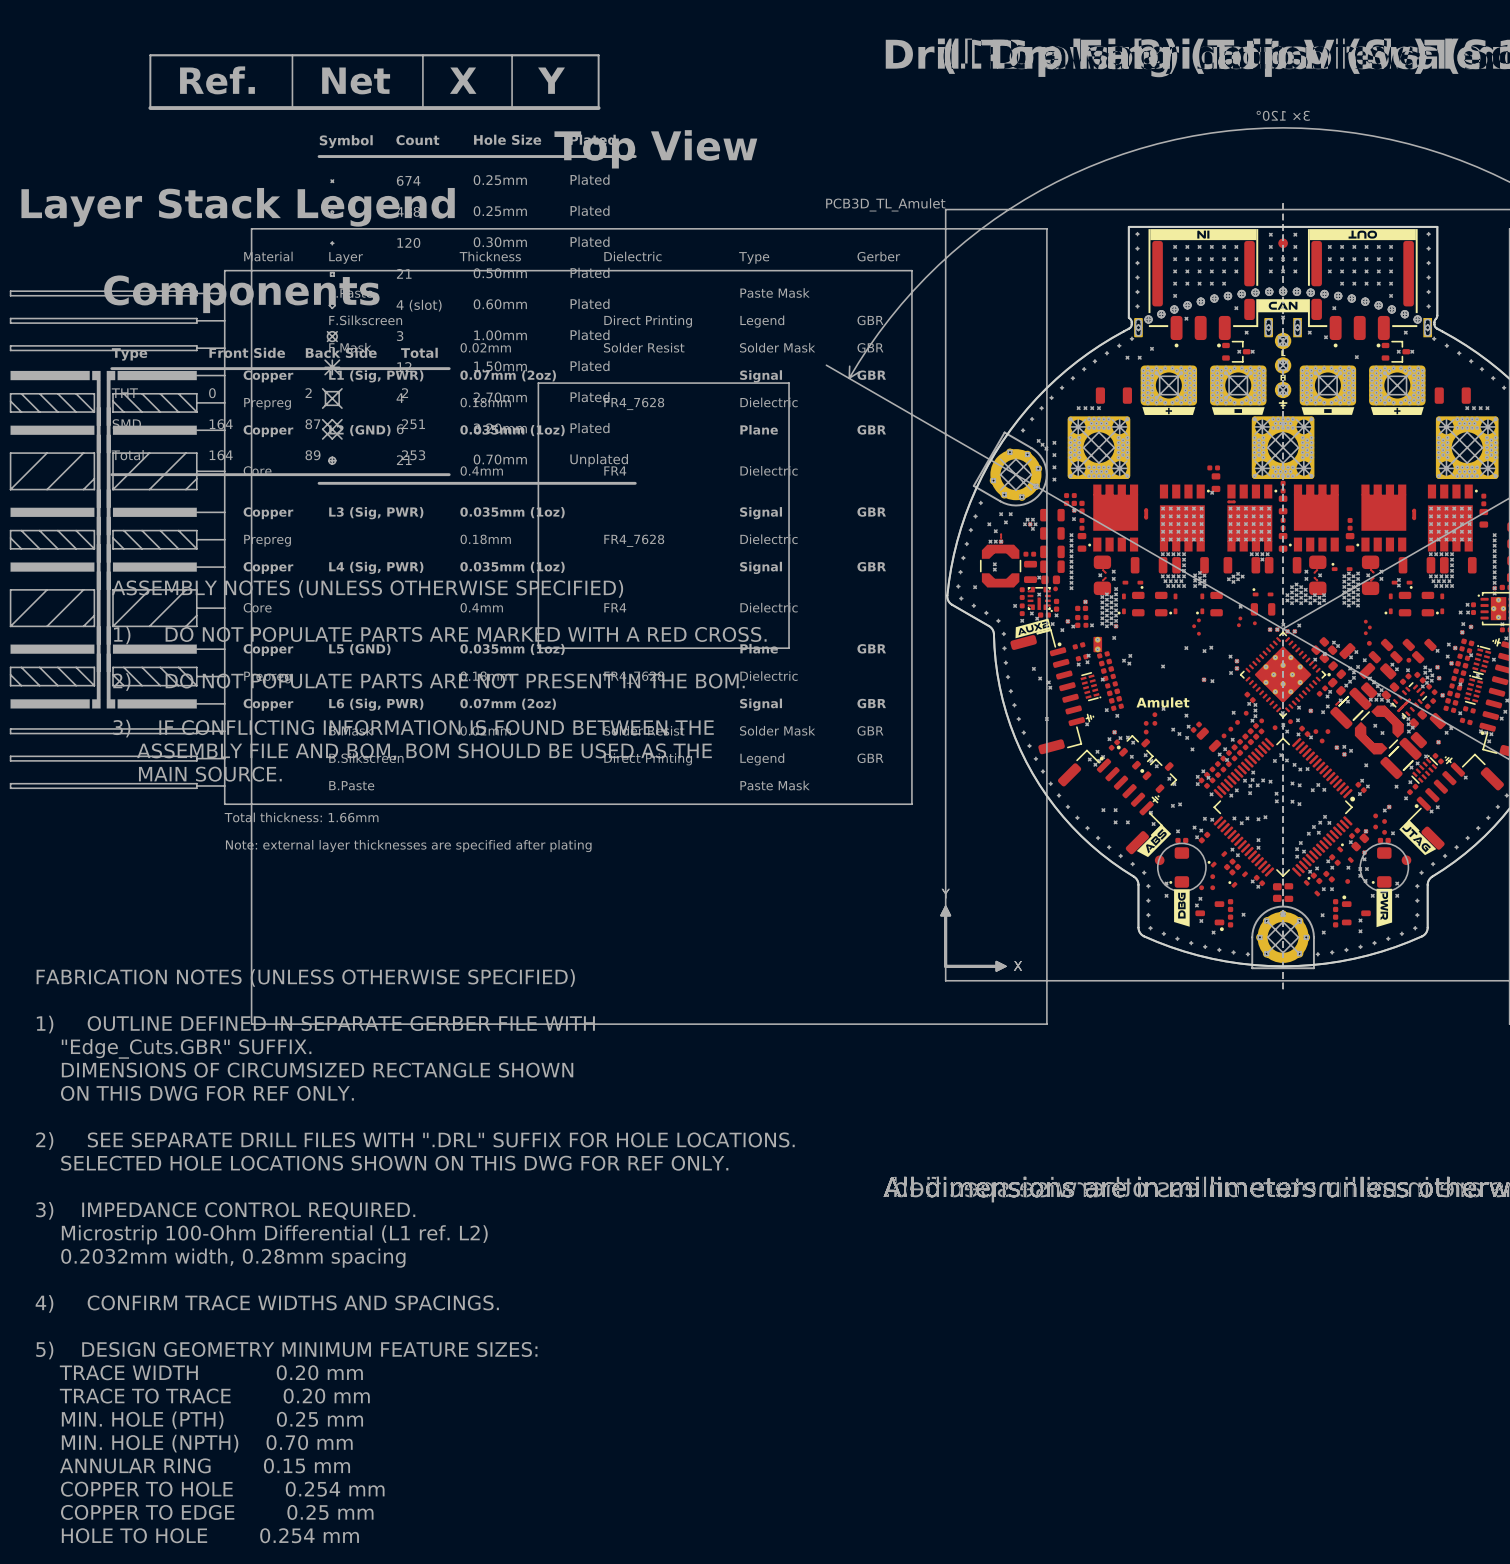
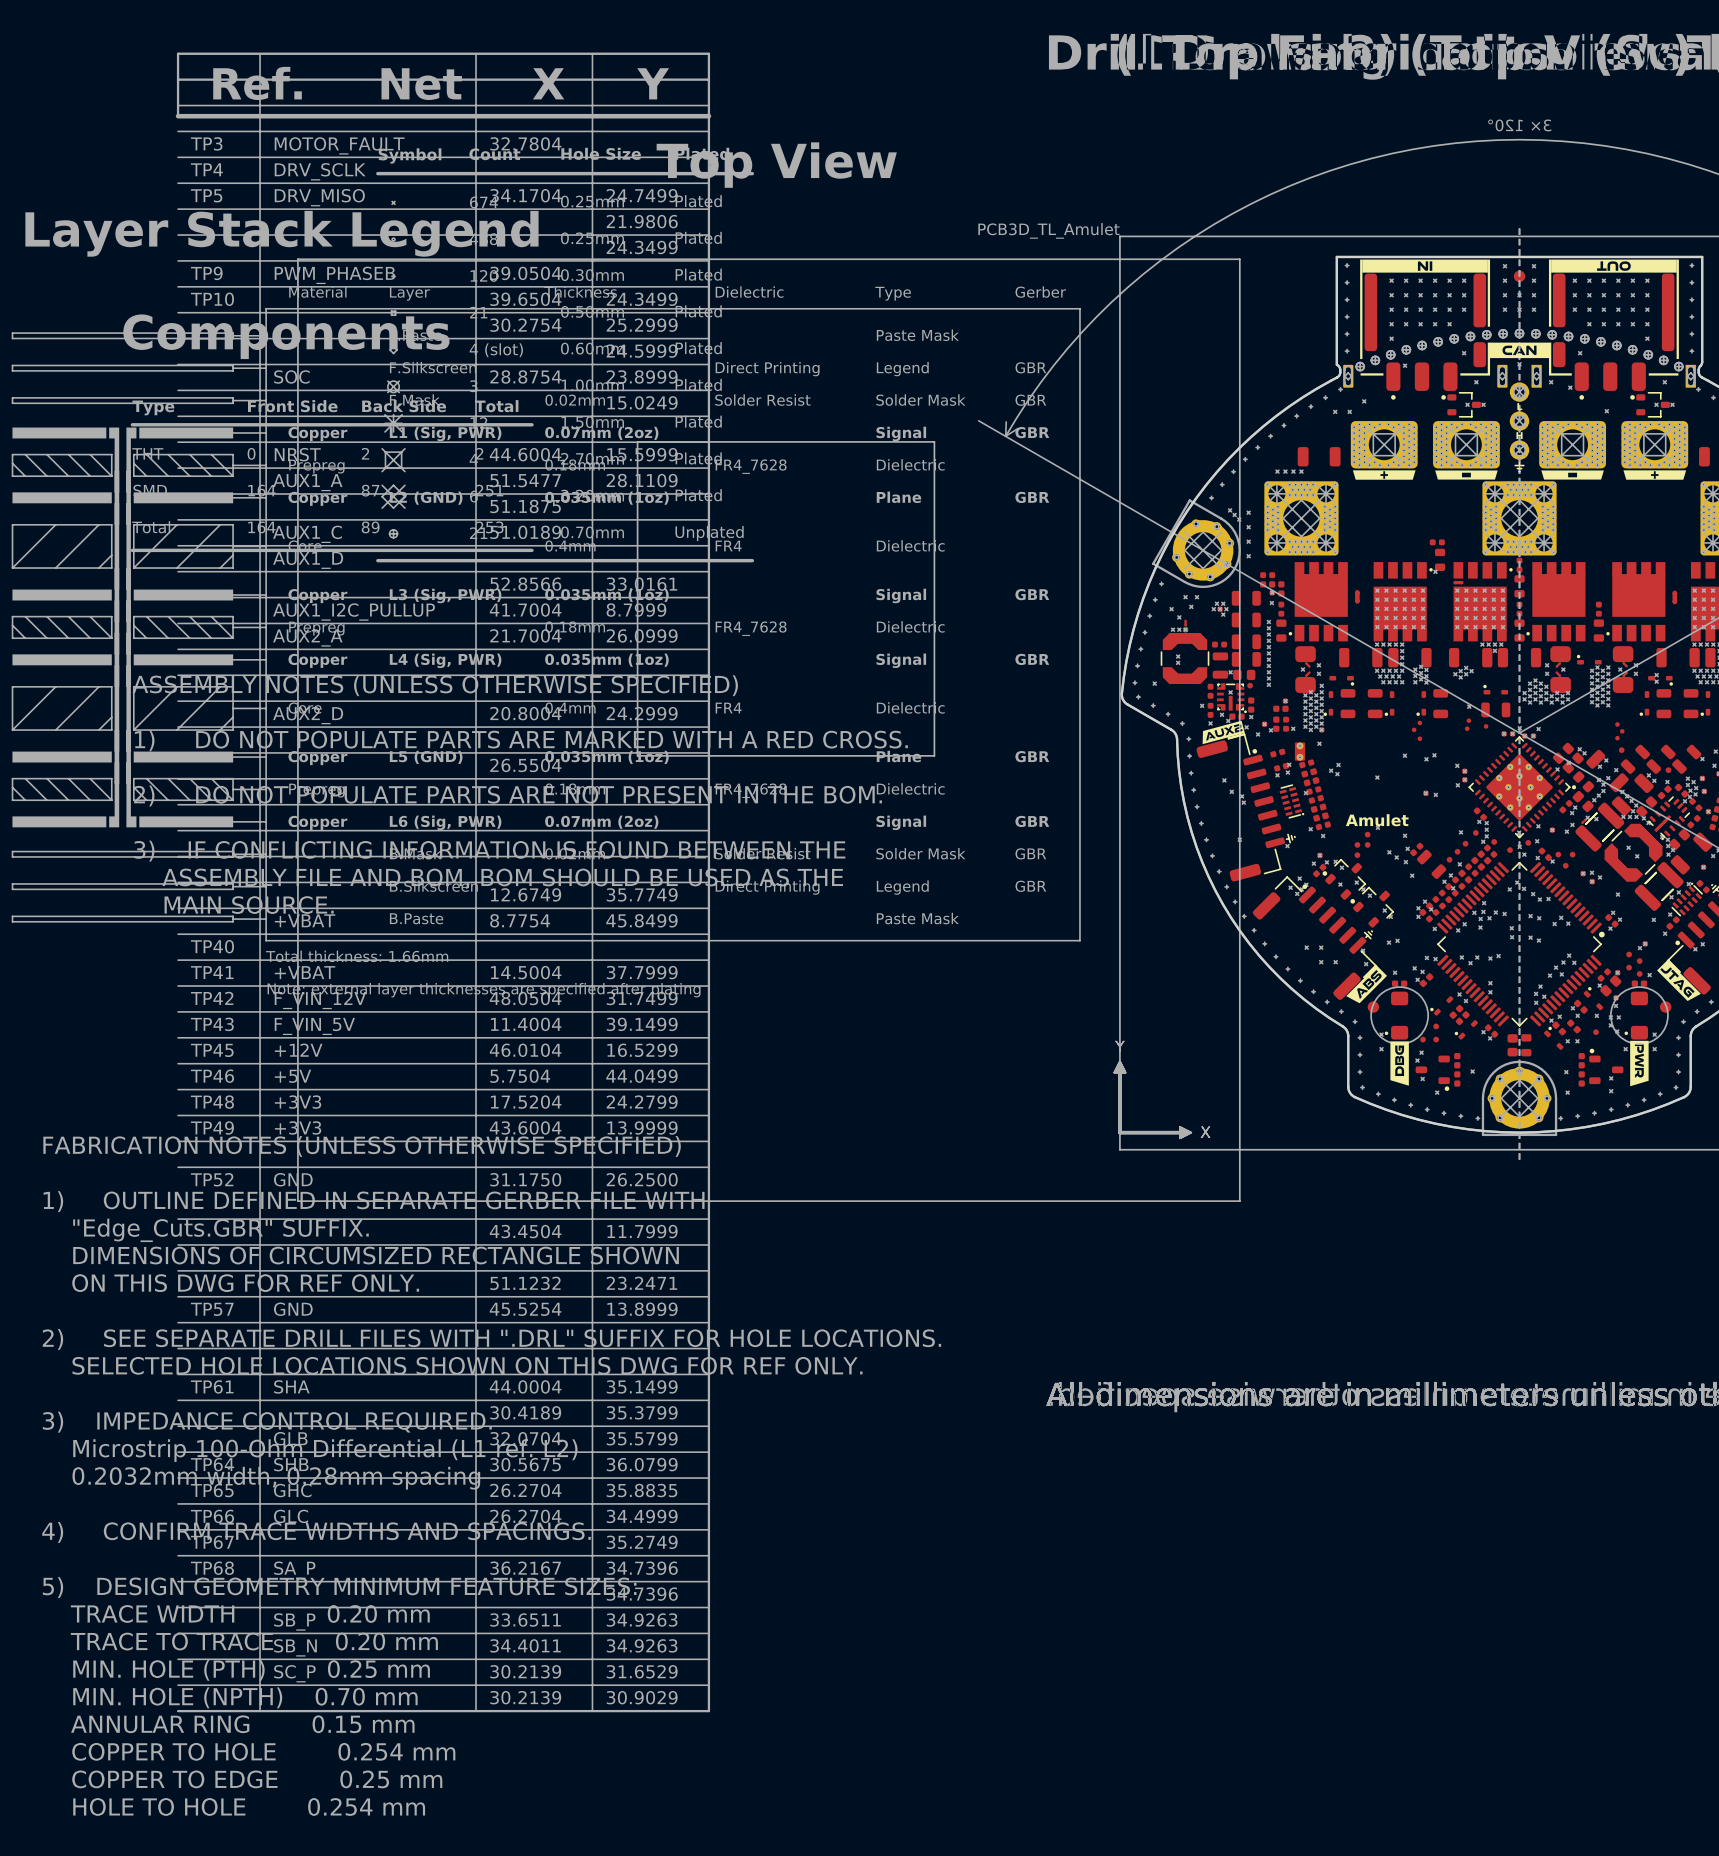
line: none -> (260, 53) (260, 1711)
line: (292, 55) (292, 108) -> none
line: none -> (476, 53) (476, 1711)
line: (422, 55) (422, 108) -> none
line: none -> (592, 53) (592, 1711)
line: (512, 55) (512, 108) -> none
line: none -> (178, 79) (708, 79)
line: none -> (178, 105) (708, 105)
line: none -> (708, 116) (708, 1711) (178, 1711)
line: none -> (178, 131) (708, 131)
text: none -> TP3 (206, 143)
text: none -> 32.7804 (525, 143)
text: none -> MOTOR_FAULT (339, 145)
line: none -> (178, 157) (708, 157)
text: none -> TP4 (206, 169)
text: none -> DRV_SCLK (320, 171)
line: none -> (178, 183) (708, 183)
text: none -> TP5 (206, 195)
text: none -> 34.1704 (525, 195)
text: none -> 24.7499 (642, 195)
text: none -> DRV_MISO (319, 197)
line: none -> (178, 209) (708, 209)
text: none -> 21.9806 (642, 221)
line: none -> (178, 235) (708, 235)
text: none -> 24.3499 (642, 247)
line: none -> (178, 260) (708, 260)
text: none -> TP9 (206, 273)
text: none -> 39.0504 (525, 273)
text: none -> PWM_PHASEB (334, 275)
line: none -> (178, 286) (708, 286)
text: none -> TP10 (212, 299)
text: none -> 39.6504 (525, 299)
text: none -> 24.3499 (642, 299)
line: none -> (178, 312) (708, 312)
text: none -> 30.2754 (525, 325)
text: none -> 25.2999 (642, 325)
line: none -> (178, 338) (708, 338)
text: none -> 24.5999 (642, 351)
line: none -> (178, 364) (708, 364)
text: none -> SOC (291, 376)
text: none -> 28.8754 (525, 376)
text: none -> 23.8999 (642, 376)
line: none -> (178, 390) (708, 390)
text: none -> 15.0249 (642, 402)
line: none -> (178, 416) (708, 416)
line: none -> (178, 442) (708, 442)
text: none -> NRST (297, 454)
text: none -> 44.6004 (525, 454)
text: none -> 15.5999 (642, 454)
line: none -> (178, 468) (708, 468)
text: none -> 51.5477 (525, 480)
text: none -> 28.1109 (642, 480)
text: none -> AUX1_A (307, 482)
line: none -> (178, 493) (708, 493)
text: none -> 51.1875 (525, 506)
line: none -> (178, 519) (708, 519)
text: none -> 51.0189 (525, 532)
text: none -> AUX1_C (307, 534)
line: none -> (178, 545) (708, 545)
text: none -> AUX1_D (308, 560)
line: none -> (178, 571) (708, 571)
text: none -> 52.8566 (525, 584)
text: none -> 33.0161 (641, 584)
line: none -> (178, 597) (708, 597)
text: none -> 41.7004 (525, 610)
text: none -> 8.7999 (636, 610)
text: none -> AUX1_I2C_PULLUP (354, 612)
line: none -> (178, 623) (708, 623)
text: none -> 21.7004 (525, 635)
text: none -> 26.0999 (642, 635)
text: none -> AUX2_A (307, 637)
line: none -> (178, 649) (708, 649)
line: none -> (178, 675) (708, 675)
line: none -> (178, 701) (708, 701)
text: none -> 20.8004 (525, 713)
text: none -> 24.2999 (642, 713)
text: none -> AUX2_D (308, 715)
line: none -> (178, 727) (708, 727)
line: none -> (178, 752) (708, 752)
text: none -> 26.5504 (525, 765)
line: none -> (178, 778) (708, 778)
line: none -> (178, 804) (708, 804)
line: none -> (178, 830) (708, 830)
line: none -> (178, 856) (708, 856)
line: none -> (178, 882) (708, 882)
text: none -> 12.6749 (526, 894)
text: none -> 35.7749 (642, 894)
line: none -> (178, 908) (708, 908)
text: none -> +VBAT (305, 920)
text: none -> 8.7754 (520, 920)
text: none -> 45.8499 (641, 920)
line: none -> (178, 934) (708, 934)
text: none -> TP40 (212, 946)
line: none -> (178, 960) (708, 960)
text: none -> TP41 (212, 972)
text: none -> +VBAT (305, 972)
text: none -> 14.5004 (526, 972)
text: none -> 37.7999 (642, 972)
line: none -> (178, 986) (708, 986)
text: none -> TP42 (212, 998)
text: none -> 48.0504 (525, 998)
text: none -> 31.7499 (642, 998)
text: none -> F_VIN_12V (320, 1000)
line: none -> (178, 1011) (708, 1011)
text: none -> TP43 (212, 1024)
text: none -> 11.4004 (526, 1024)
text: none -> 39.1499 (642, 1024)
text: none -> F_VIN_5V (314, 1026)
line: none -> (178, 1037) (708, 1037)
text: none -> TP45 (212, 1050)
text: none -> +12V (298, 1050)
text: none -> 46.0104 (525, 1050)
text: none -> 16.5299 (642, 1050)
line: none -> (178, 1063) (708, 1063)
text: none -> TP46 (212, 1076)
text: none -> +5V (293, 1076)
text: none -> 5.7504 (520, 1076)
text: none -> 44.0499 (641, 1076)
line: none -> (178, 1089) (708, 1089)
text: none -> TP48 (212, 1102)
text: none -> +3V3 (298, 1102)
text: none -> 17.5204 (526, 1102)
text: none -> 24.2799 (642, 1102)
line: none -> (178, 1115) (708, 1115)
text: none -> TP49 (212, 1127)
text: none -> +3V3 (298, 1127)
text: none -> 43.6004 (525, 1127)
text: none -> 13.9999 (642, 1127)
line: none -> (178, 1141) (708, 1141)
line: none -> (178, 1167) (708, 1167)
text: none -> TP52 (212, 1179)
text: none -> GND (293, 1179)
text: none -> 31.1750 (525, 1179)
text: none -> 26.2500 (642, 1179)
line: none -> (178, 1219) (708, 1219)
text: none -> 43.4504 (525, 1231)
text: none -> 11.7999 (642, 1231)
line: none -> (178, 1244) (708, 1244)
line: none -> (178, 1270) (708, 1270)
text: none -> 51.1232 (525, 1283)
text: none -> 23.2471 (641, 1283)
line: none -> (178, 1296) (708, 1296)
text: none -> TP57 (212, 1309)
text: none -> GND (293, 1309)
text: none -> 45.5254 (525, 1309)
text: none -> 13.8999 (642, 1309)
line: none -> (178, 1322) (708, 1322)
line: none -> (178, 1348) (708, 1348)
line: none -> (178, 1374) (708, 1374)
text: none -> TP61 (212, 1386)
text: none -> SHA (291, 1386)
text: none -> 44.0004 (525, 1386)
text: none -> 35.1499 (642, 1386)
line: none -> (178, 1400) (708, 1400)
text: none -> 30.4189 (525, 1412)
text: none -> 35.3799 (642, 1412)
line: none -> (178, 1426) (708, 1426)
text: none -> GLB (290, 1438)
text: none -> 32.0704 (525, 1438)
text: none -> 35.5799 (642, 1438)
line: none -> (178, 1452) (708, 1452)
text: none -> TP64 (212, 1464)
text: none -> SHB (291, 1464)
text: none -> 30.5675 (525, 1464)
text: none -> 36.0799 (642, 1464)
line: none -> (178, 1478) (708, 1478)
text: none -> TP65 (212, 1490)
text: none -> GHC (292, 1490)
text: none -> 26.2704 (525, 1490)
text: none -> 35.8835 (642, 1490)
line: none -> (178, 1503) (708, 1503)
text: none -> TP66 (212, 1516)
text: none -> GLC (291, 1516)
text: none -> 26.2704 (525, 1516)
text: none -> 34.4999 (642, 1516)
line: none -> (178, 1529) (708, 1529)
text: none -> TP67 (212, 1542)
text: none -> 35.2749 (642, 1542)
line: none -> (178, 1555) (708, 1555)
text: none -> TP68 (212, 1568)
text: none -> 36.2167 (525, 1568)
text: none -> 34.7396 (642, 1568)
text: none -> SA_P (294, 1570)
line: none -> (178, 1581) (708, 1581)
text: none -> 34.7396 (642, 1594)
line: none -> (178, 1607) (708, 1607)
text: none -> 33.6511 (525, 1620)
text: none -> 34.9263 (642, 1620)
text: none -> SB_P (294, 1621)
line: none -> (178, 1633) (708, 1633)
text: none -> 34.4011 (525, 1645)
text: none -> 34.9263 (642, 1645)
text: none -> SB_N (295, 1647)
line: none -> (178, 1659) (708, 1659)
text: none -> 30.2139 (525, 1671)
text: none -> 31.6529 (642, 1671)
text: none -> SC_P (294, 1673)
line: none -> (178, 1685) (708, 1685)
text: none -> 30.2139 (525, 1697)
text: none -> 30.9029 (642, 1697)

